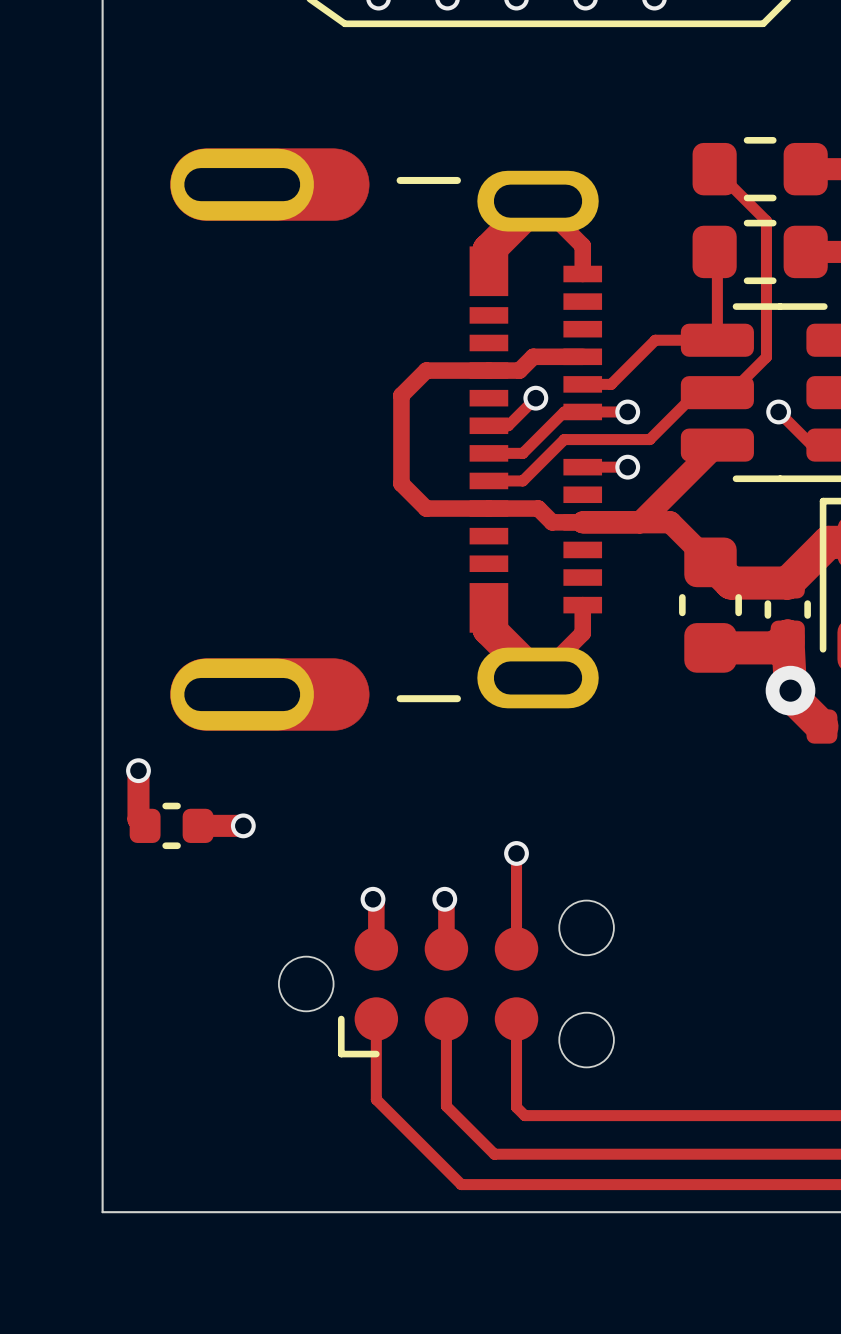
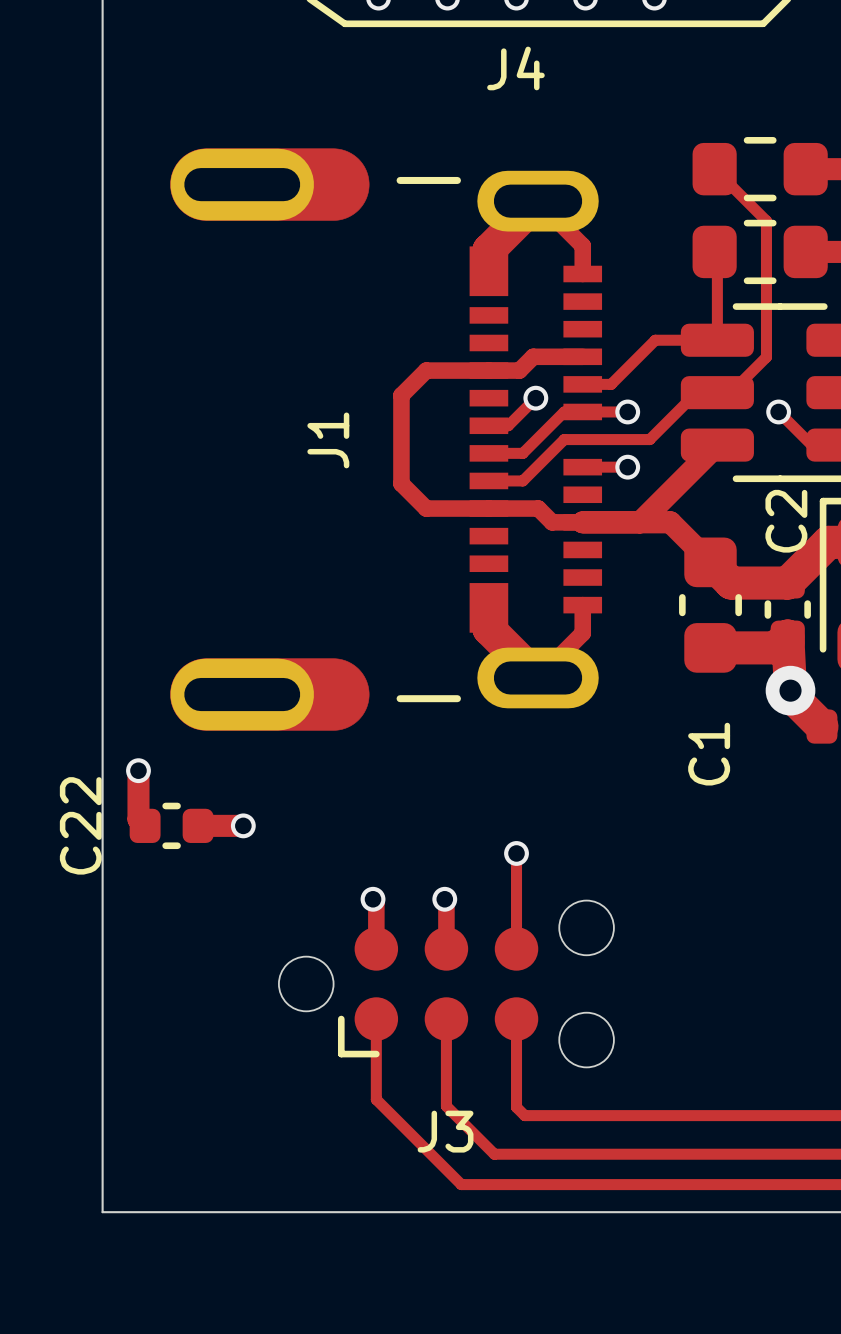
J4 name: none -> J4 (515, 68)
J1 name: none -> J1 (328, 440)
C2 name: none -> C2 (786, 521)
C1 name: none -> C1 (709, 754)
C22 name: none -> C22 (80, 825)
J3 name: none -> J3 (445, 1131)

